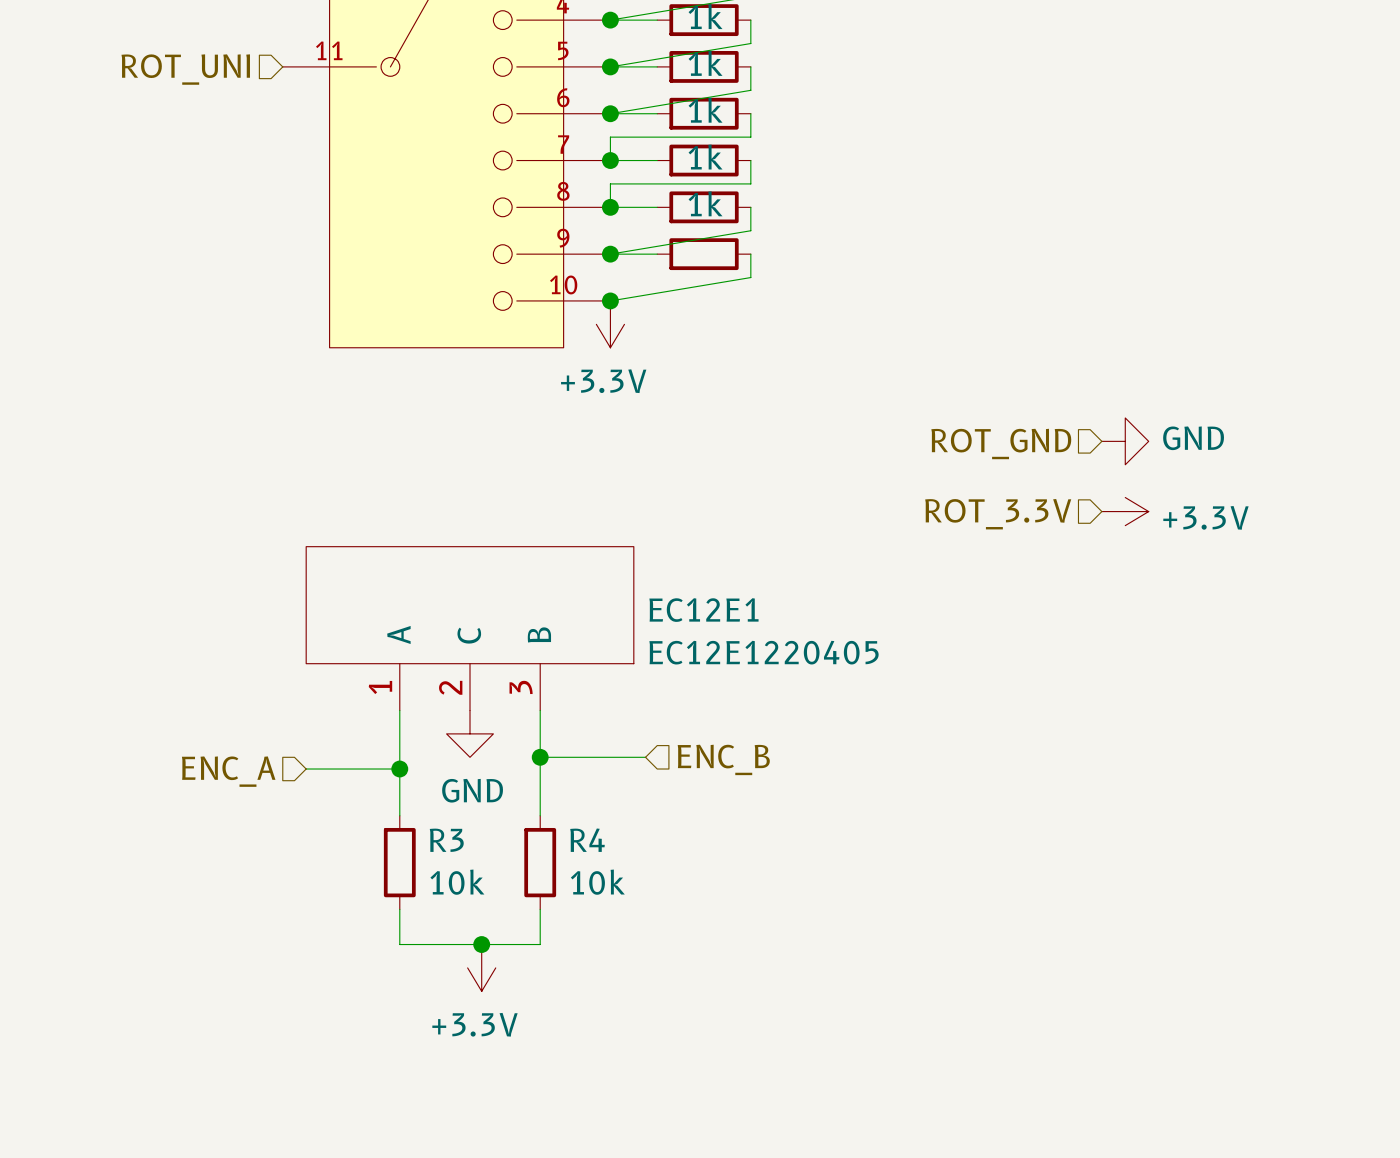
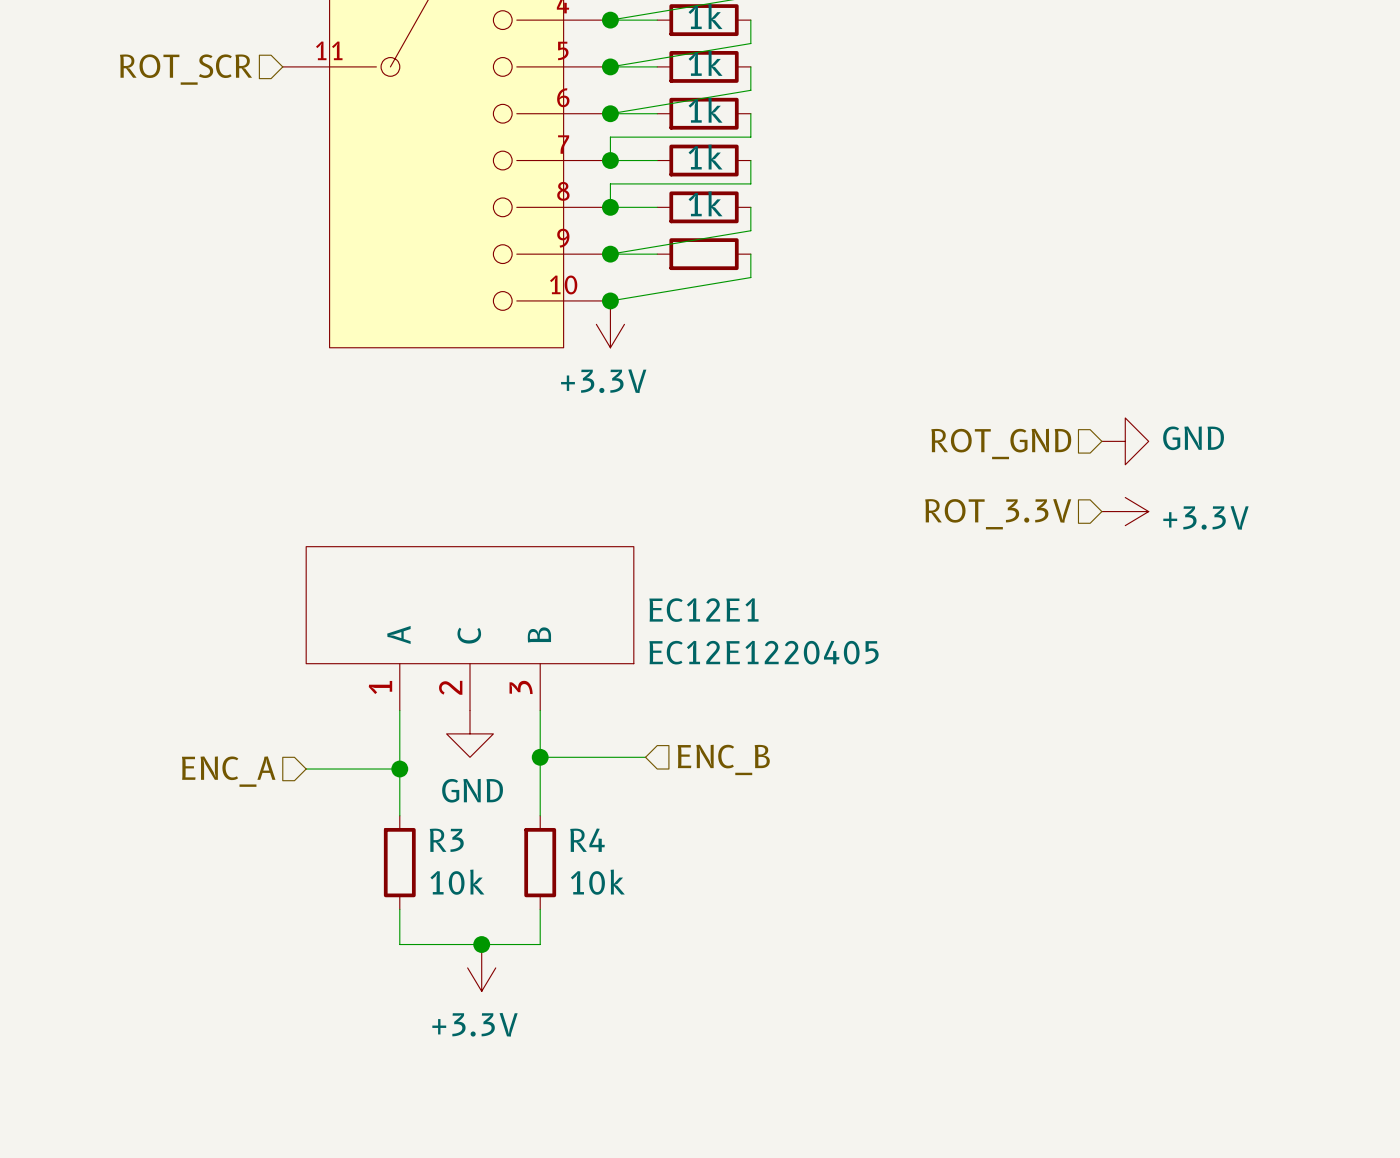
hierarchical label: ROT_UNI (185, 69) -> ROT_SCR (185, 69)

